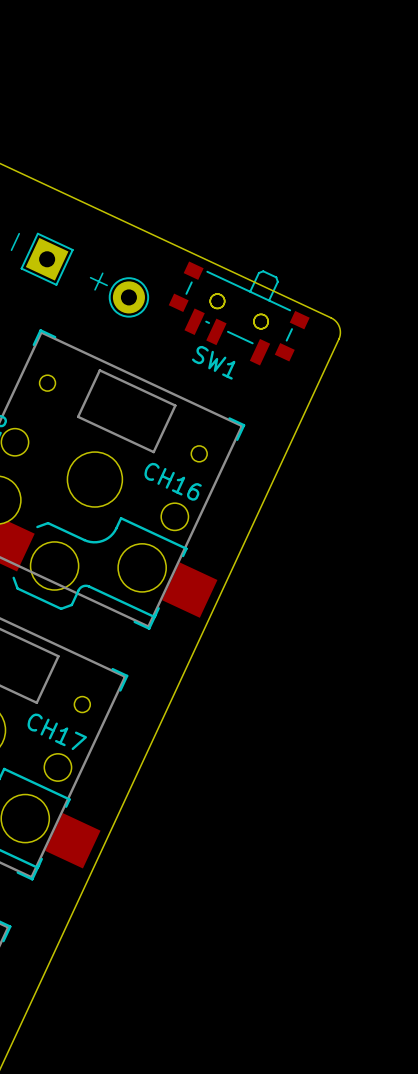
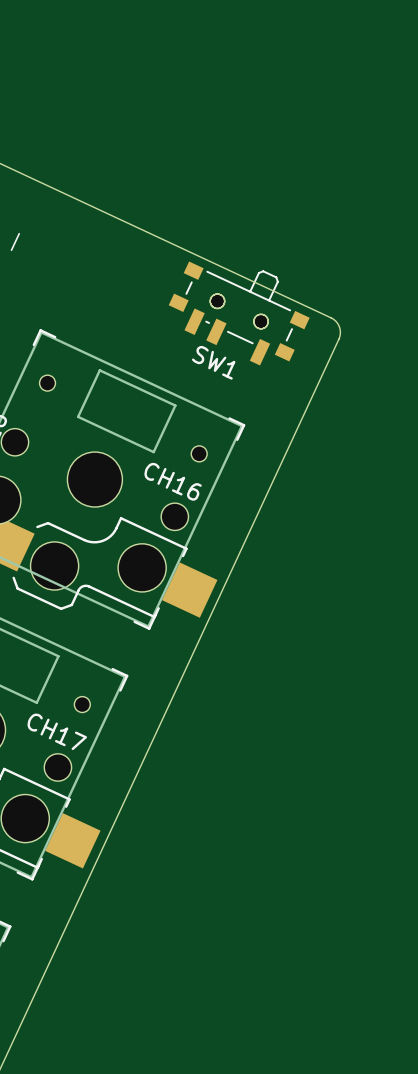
part: (47, 259) -> none
text: + (98, 281) -> none
part: (128, 297) -> none

